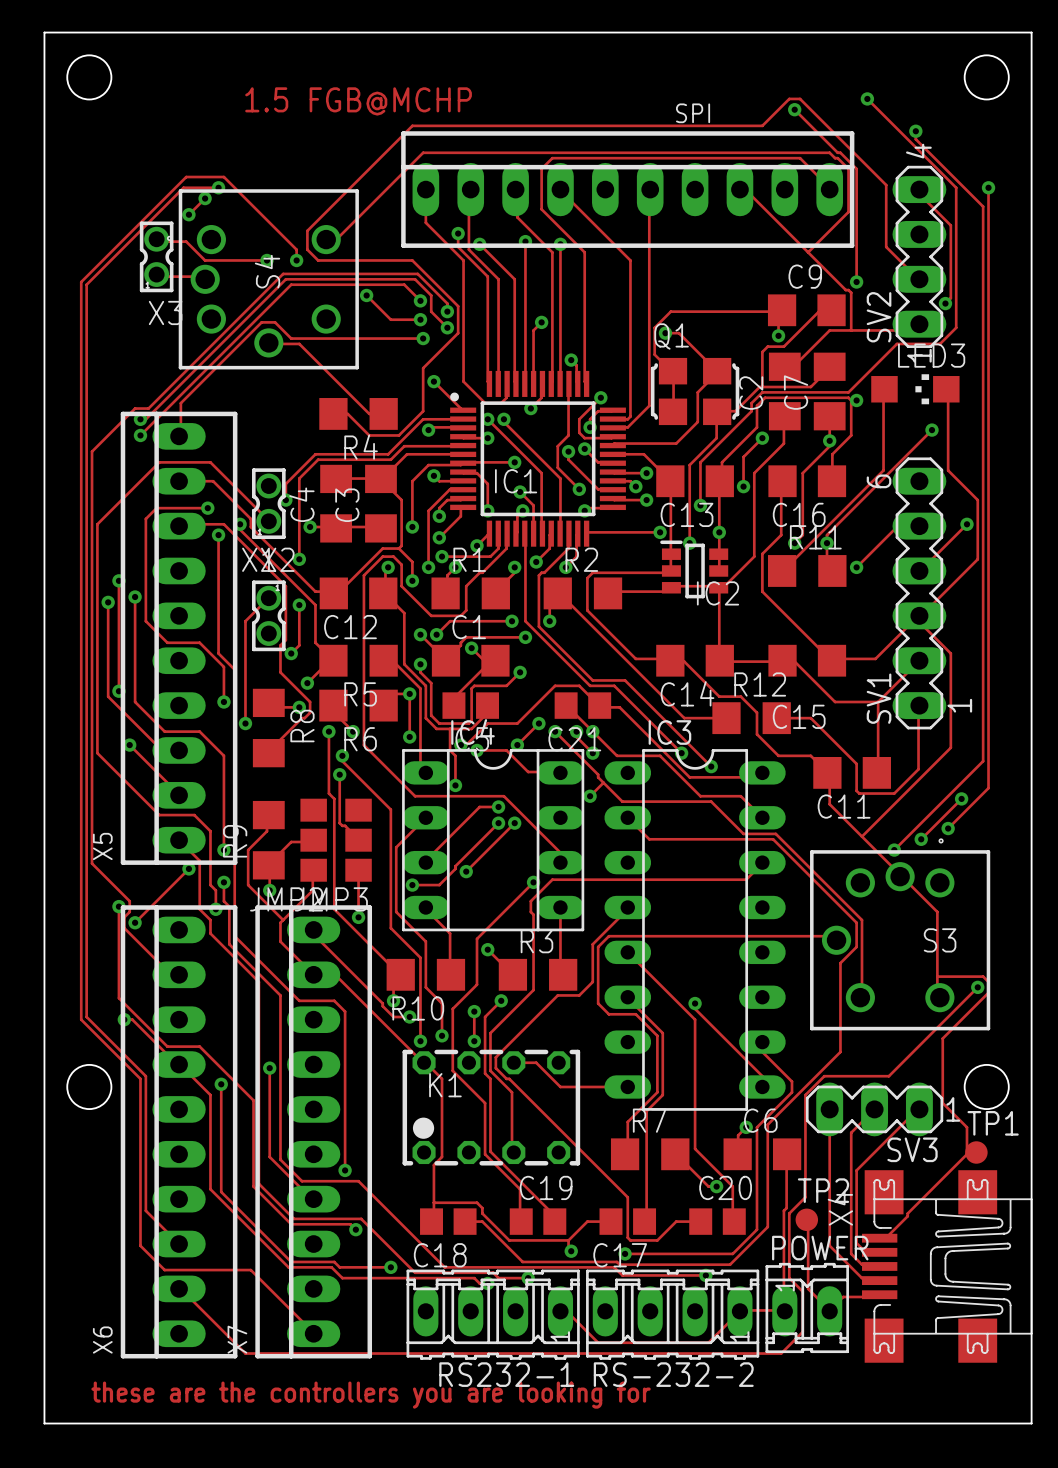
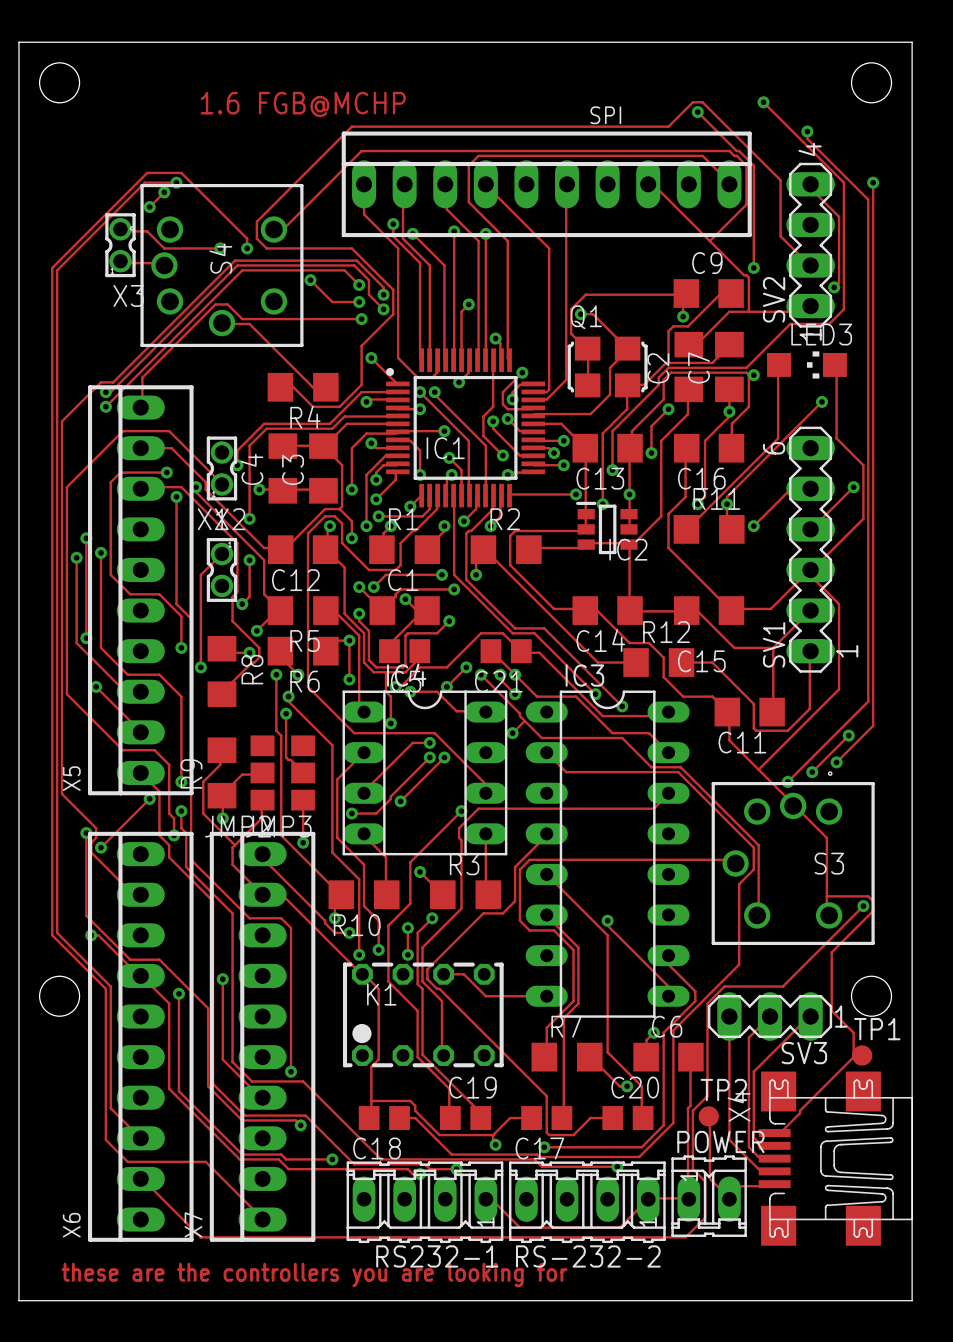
text: 1.5 FGB@MCHP (358, 101) -> 1.6 FGB@MCHP (303, 104)

